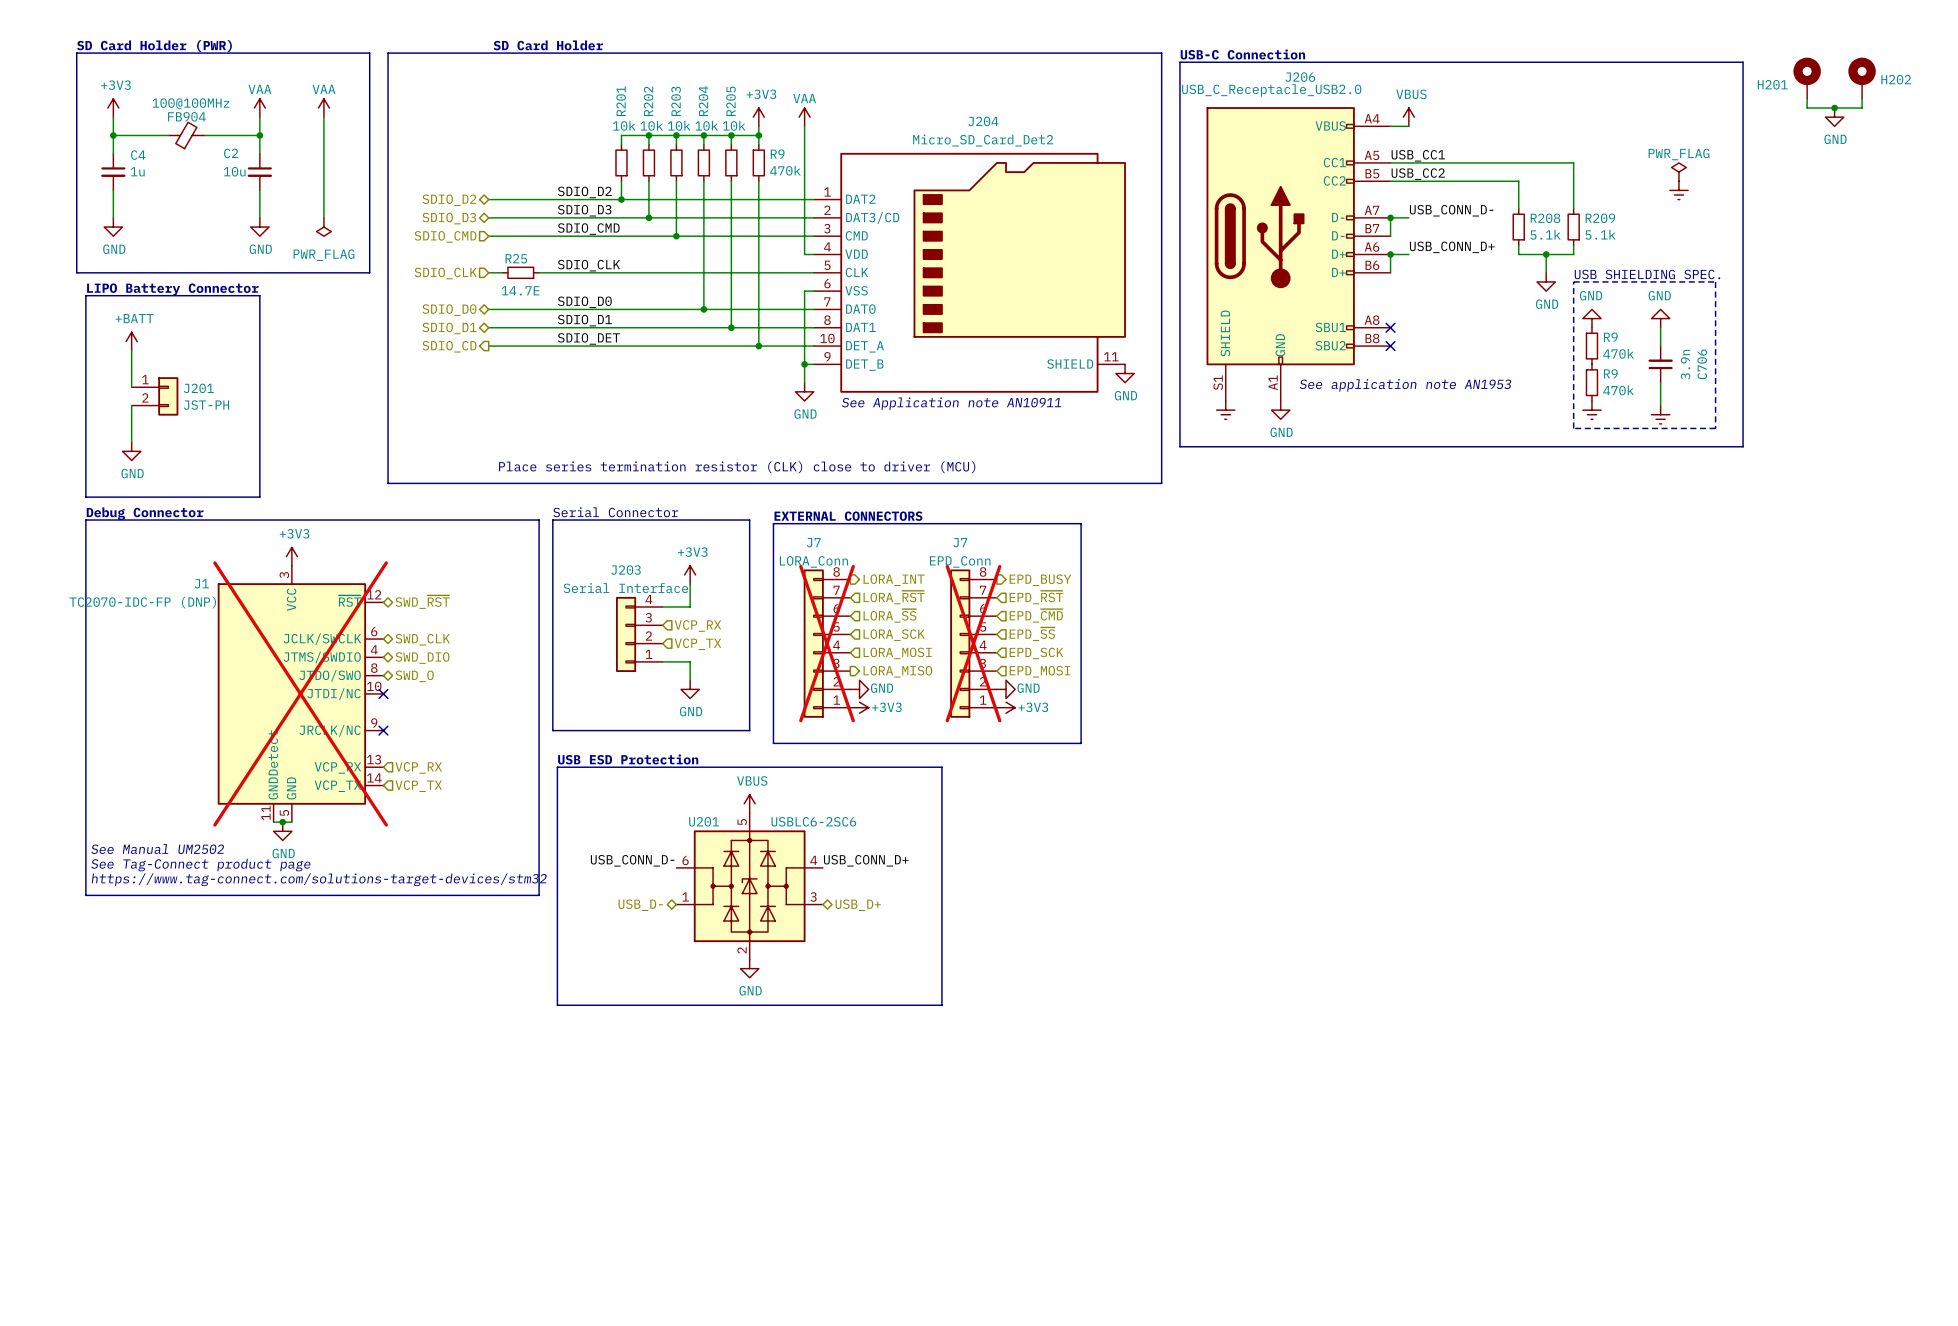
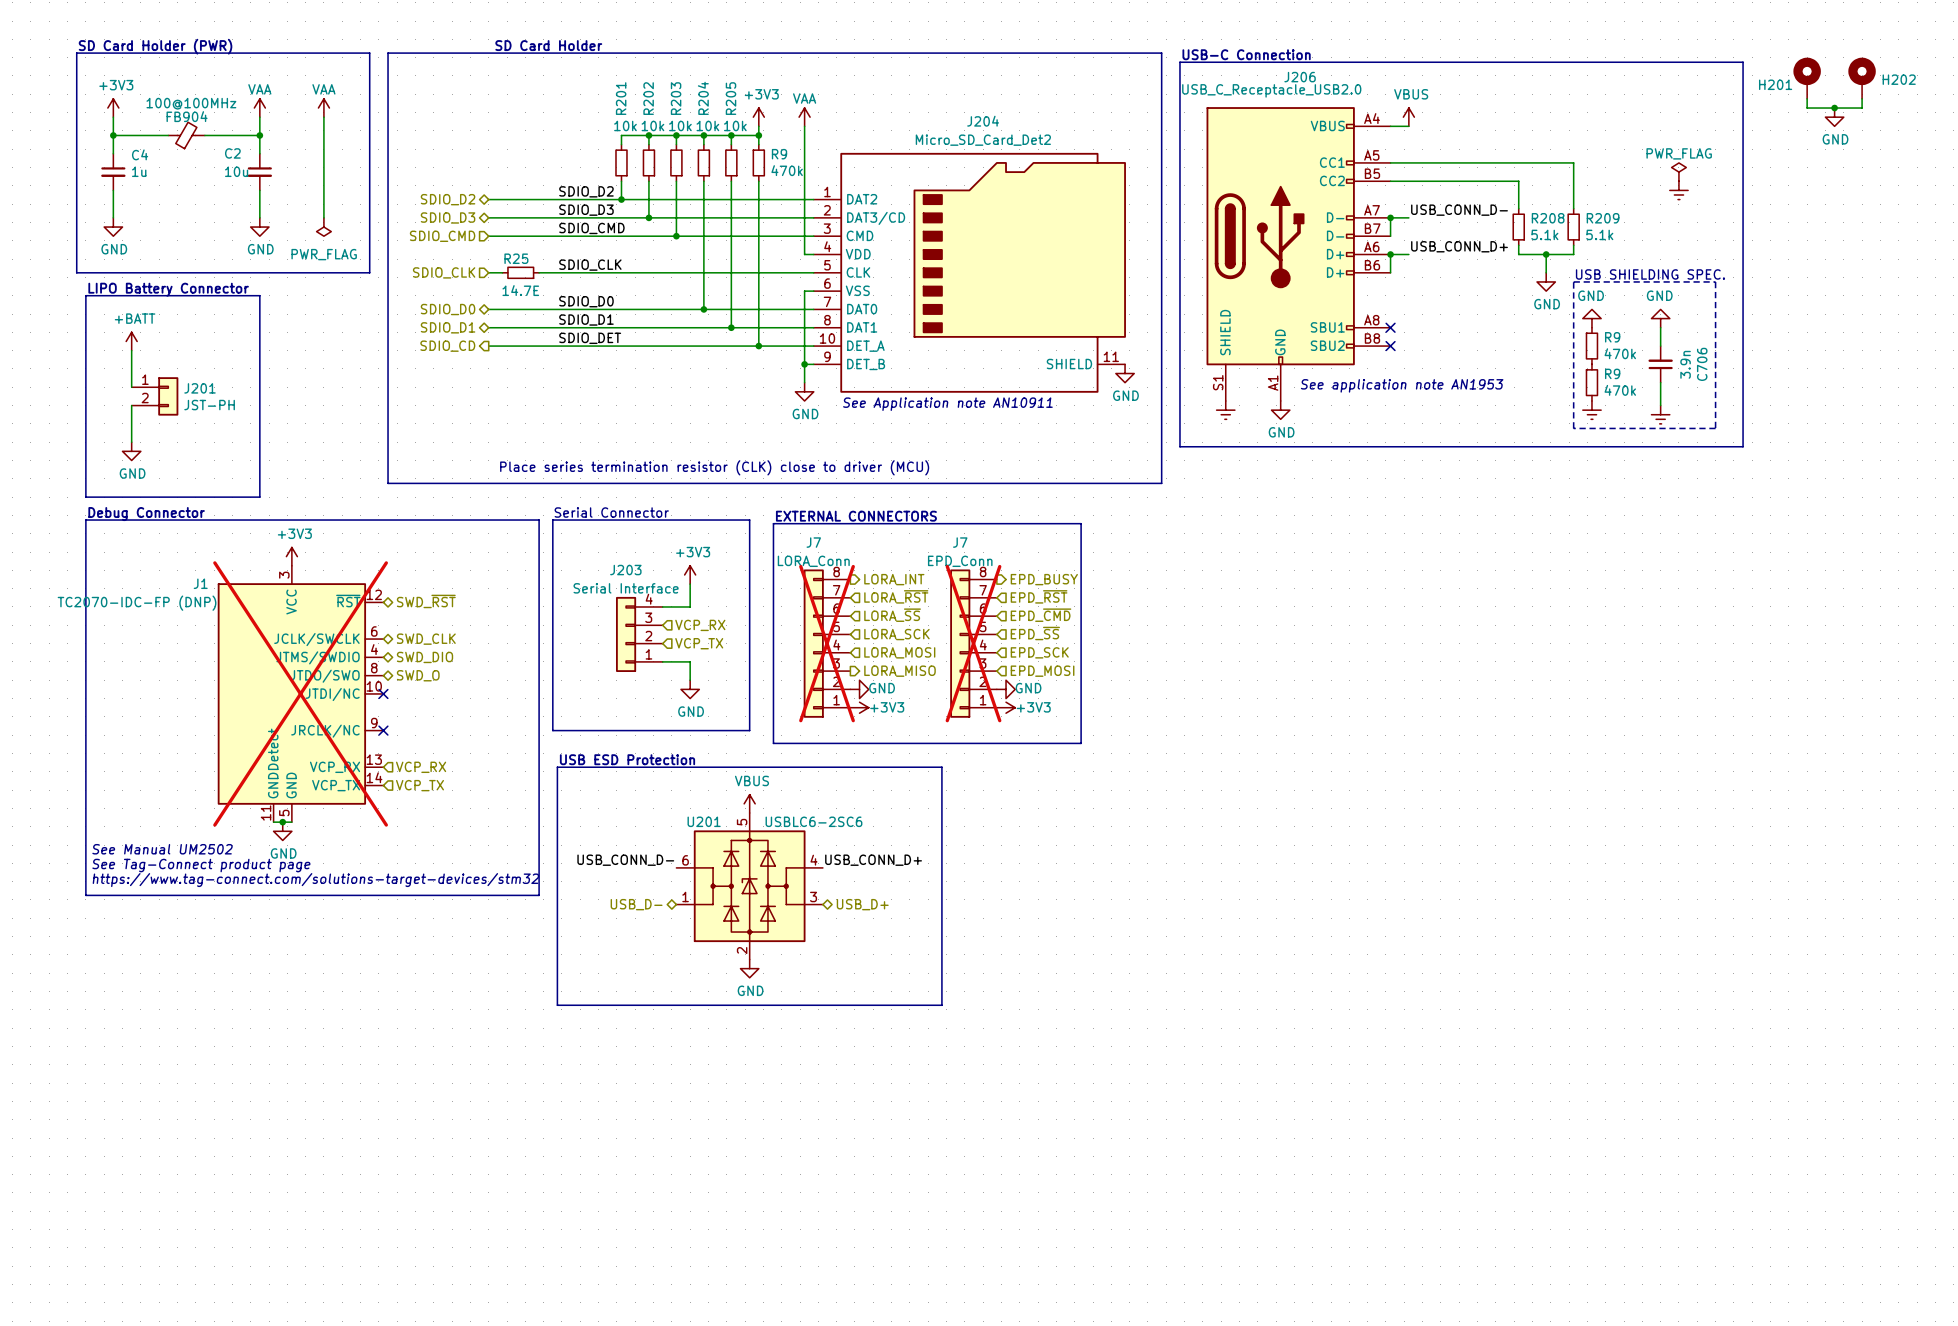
label: USB_CC1 (1418, 155) -> none
label: USB_CC2 (1418, 174) -> none

